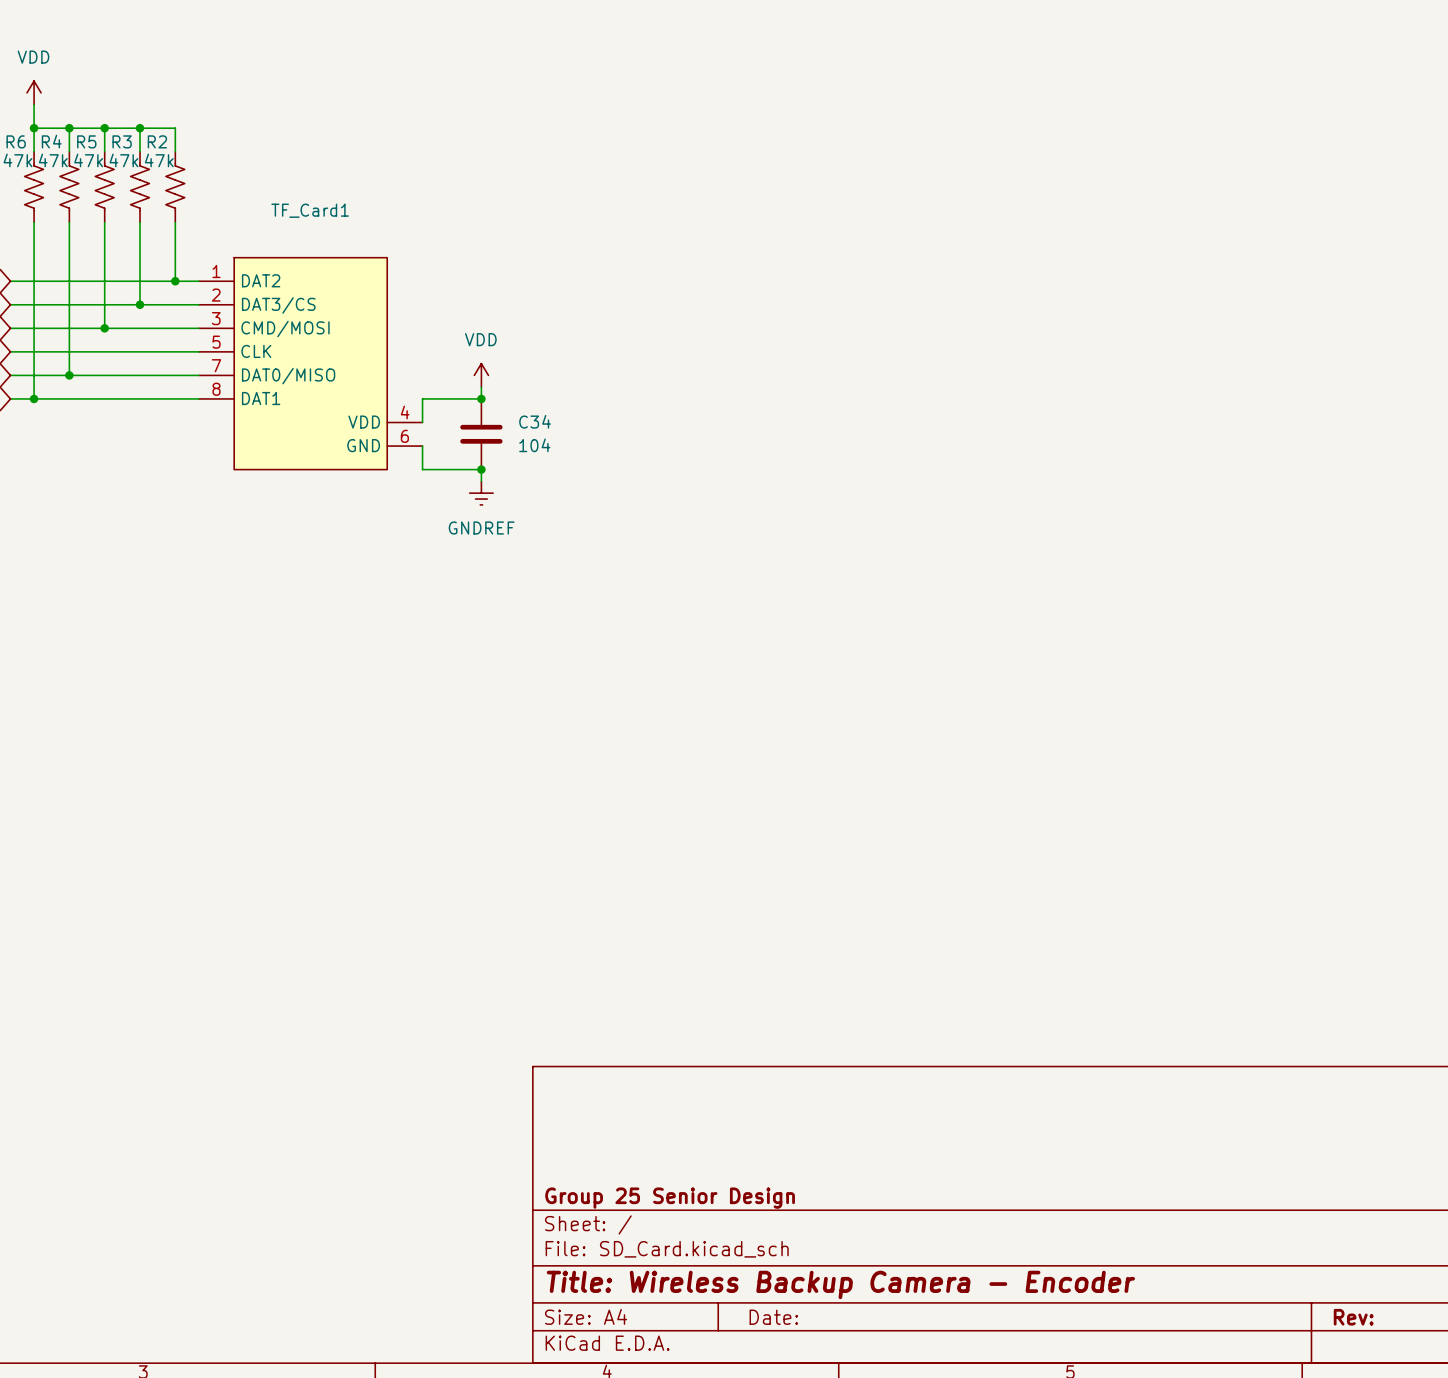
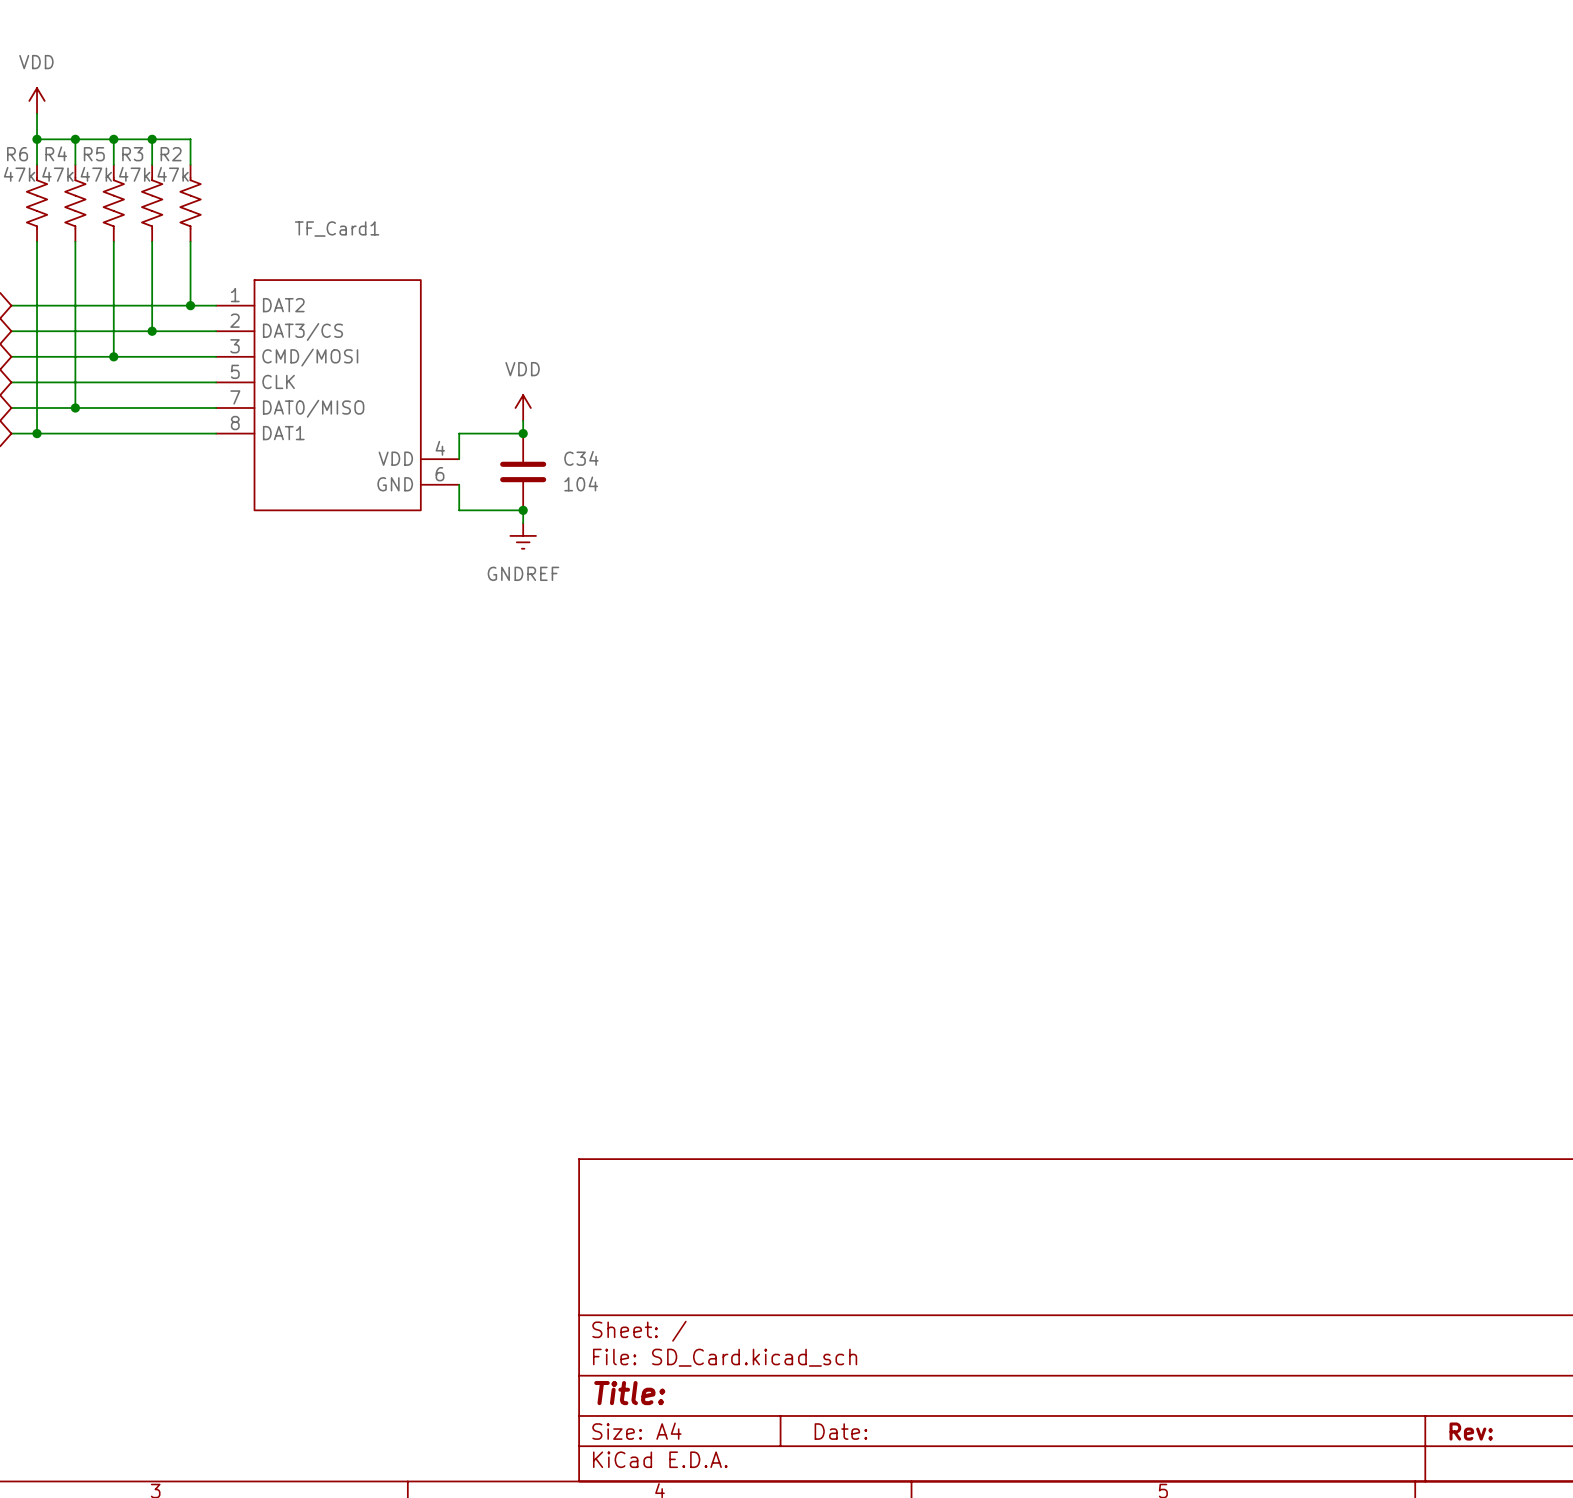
title block: Group 25 Senior Design (670, 1198) -> none
title block: Title: Wireless Backup Camera - Encoder (840, 1284) -> Title: (629, 1393)

